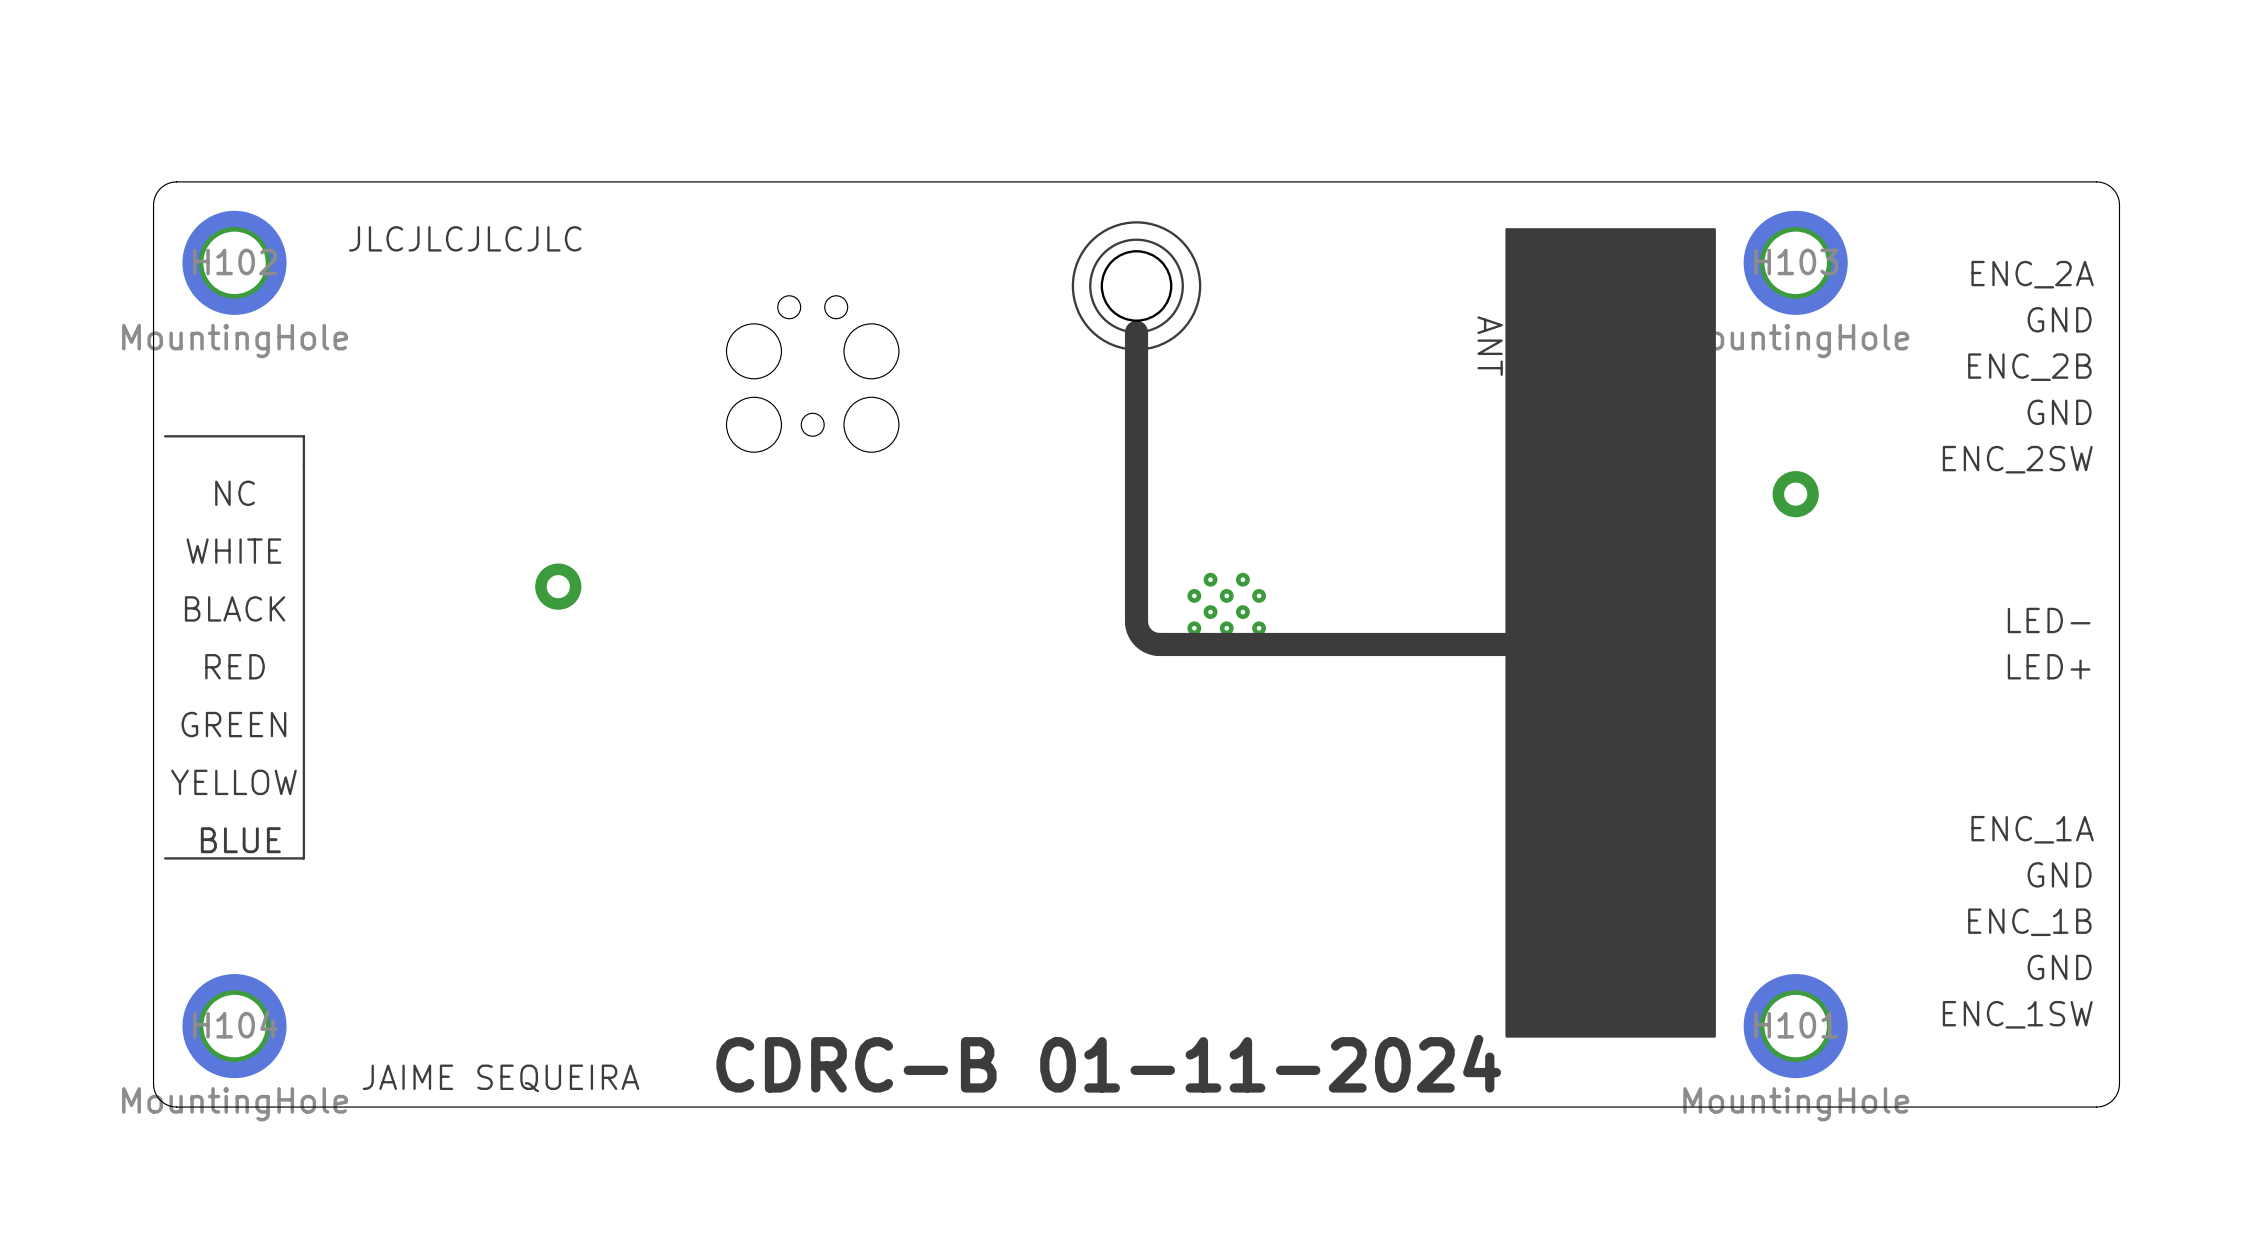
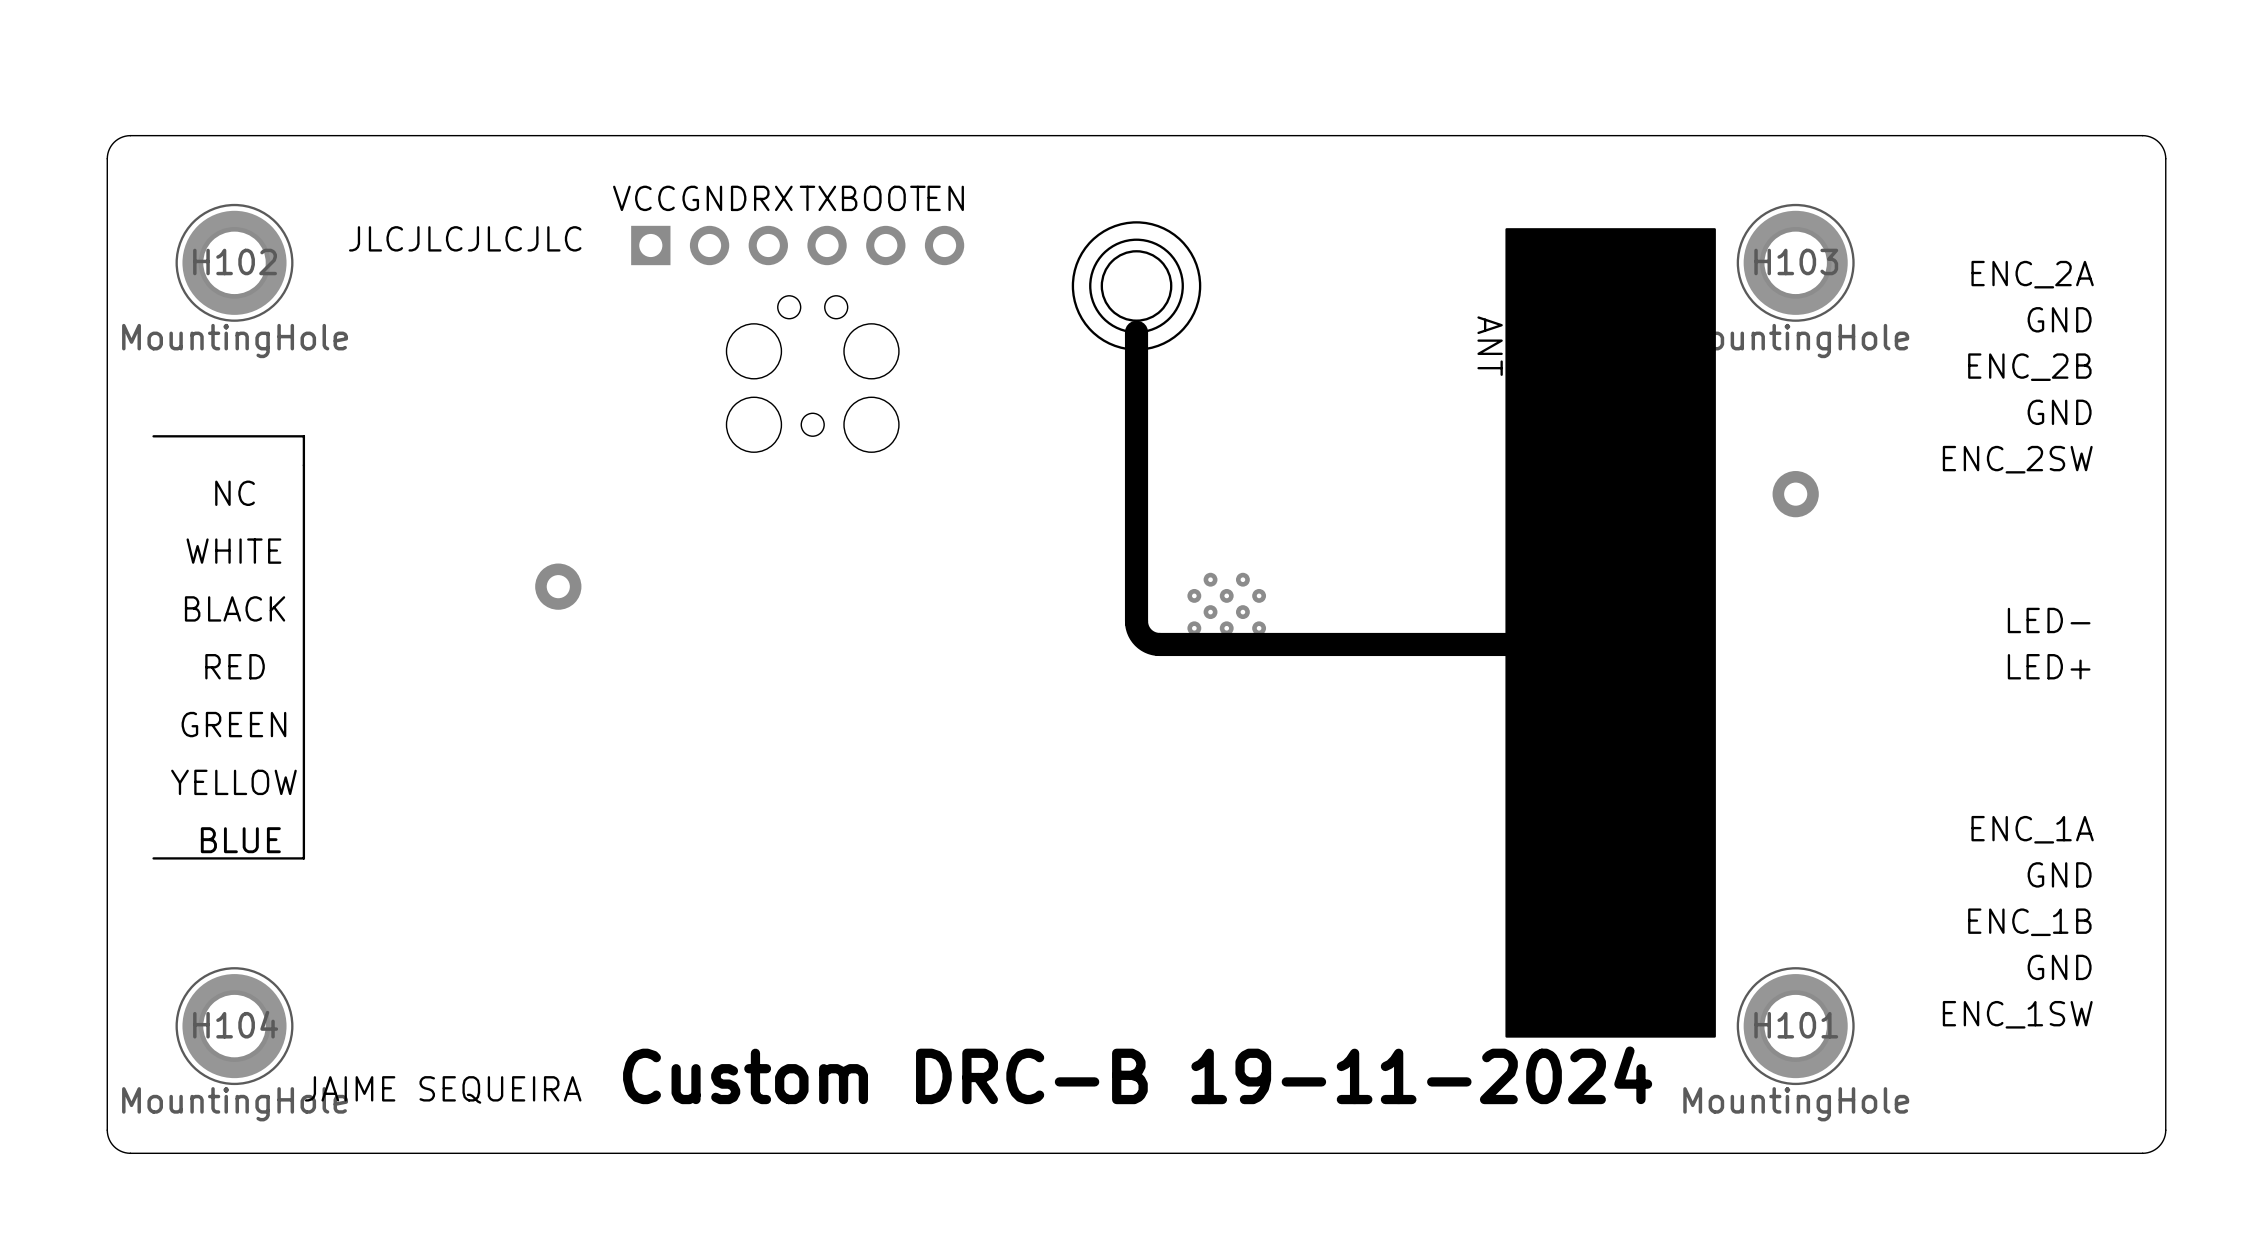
board edge: (2096, 181) (176, 181) (166, 184) (157, 192) (153, 205) (153, 1083) (155, 1093) (164, 1103) (176, 1107) (2096, 1107) (2106, 1104) (2115, 1096) (2119, 1083) (2119, 205) (2117, 194) (2112, 188) (2106, 184) (2096, 181) -> (2142, 135) (2150, 136) (2158, 142) (2164, 151) (2165, 158) (2165, 1130) (2162, 1142) (2152, 1151) (2142, 1153) (130, 1153) (118, 1149) (109, 1140) (107, 1130) (107, 158) (110, 146) (120, 137) (130, 135) (2142, 135)
text: none -> VCC (643, 198)
text: none -> GND (714, 198)
text: none -> RX (773, 198)
text: none -> TX (817, 198)
text: none -> BOOT (883, 198)
text: none -> EN (945, 198)
drawing: none -> [175, 203, 294, 322]
drawing: none -> [1736, 203, 1855, 322]
part: none -> (797, 245)
line: none -> (165, 436) (153, 436)
line: none -> (165, 858) (153, 858)
drawing: none -> [175, 967, 294, 1086]
drawing: none -> [1736, 967, 1855, 1086]
text: CDRC-B 01-11-2024 (1108, 1063) -> Custom DRC-B 19-11-2024 (1137, 1075)
text position: JAIME SEQUEIRA (501, 1078) -> JAIME SEQUEIRA (443, 1089)

